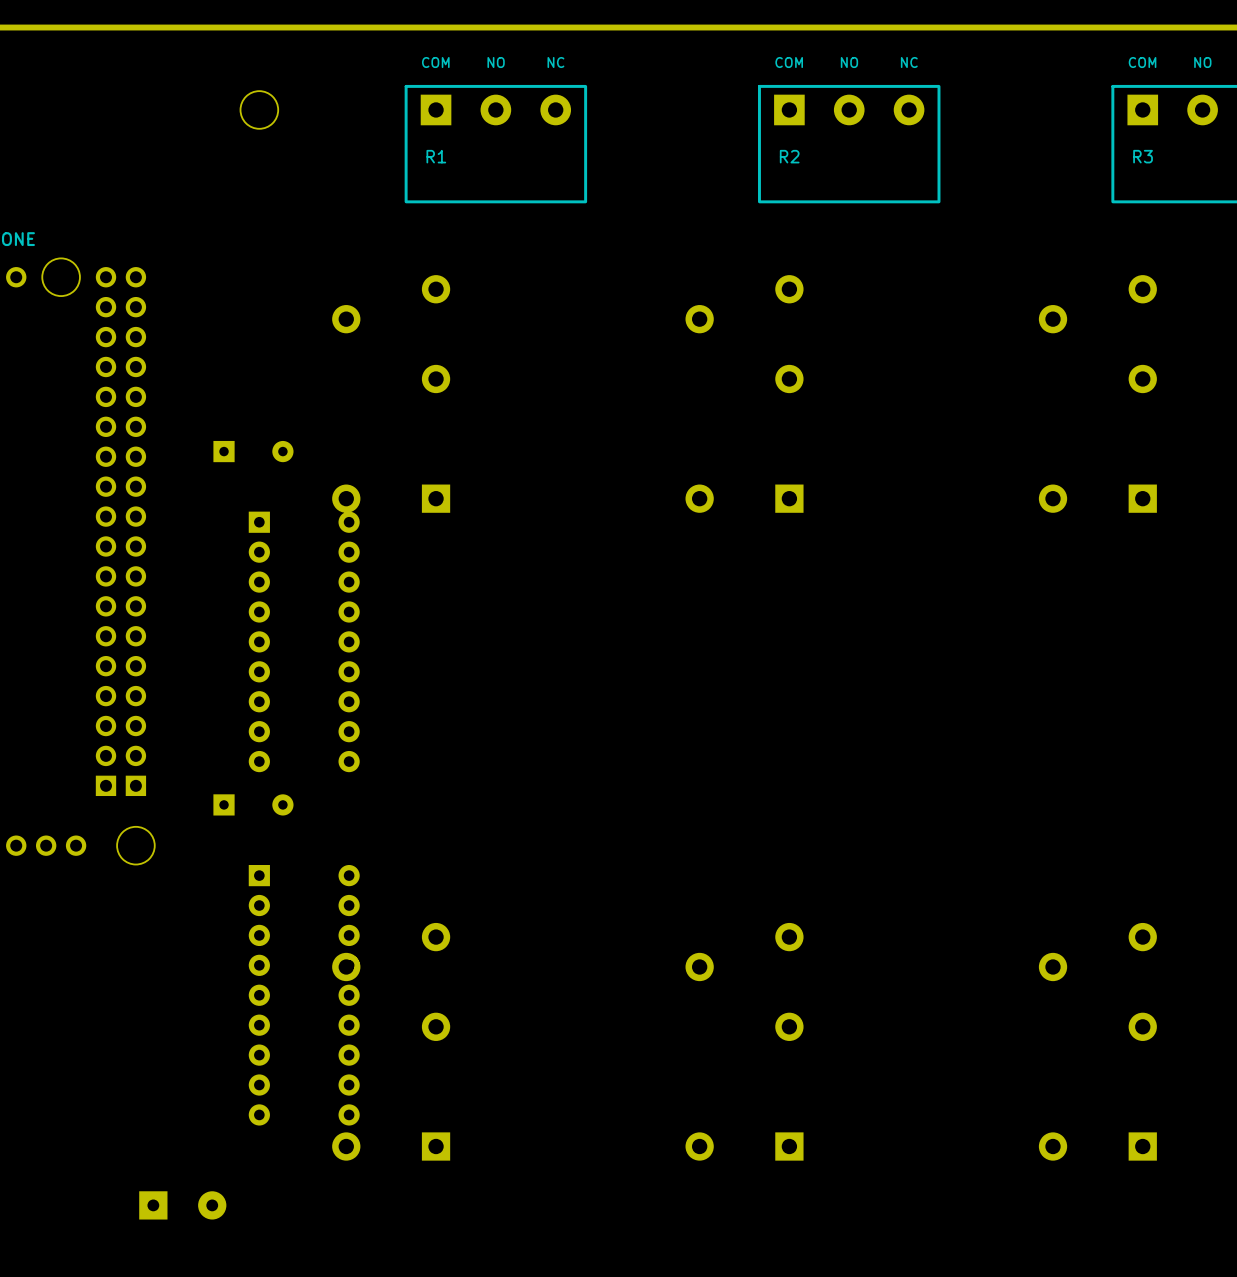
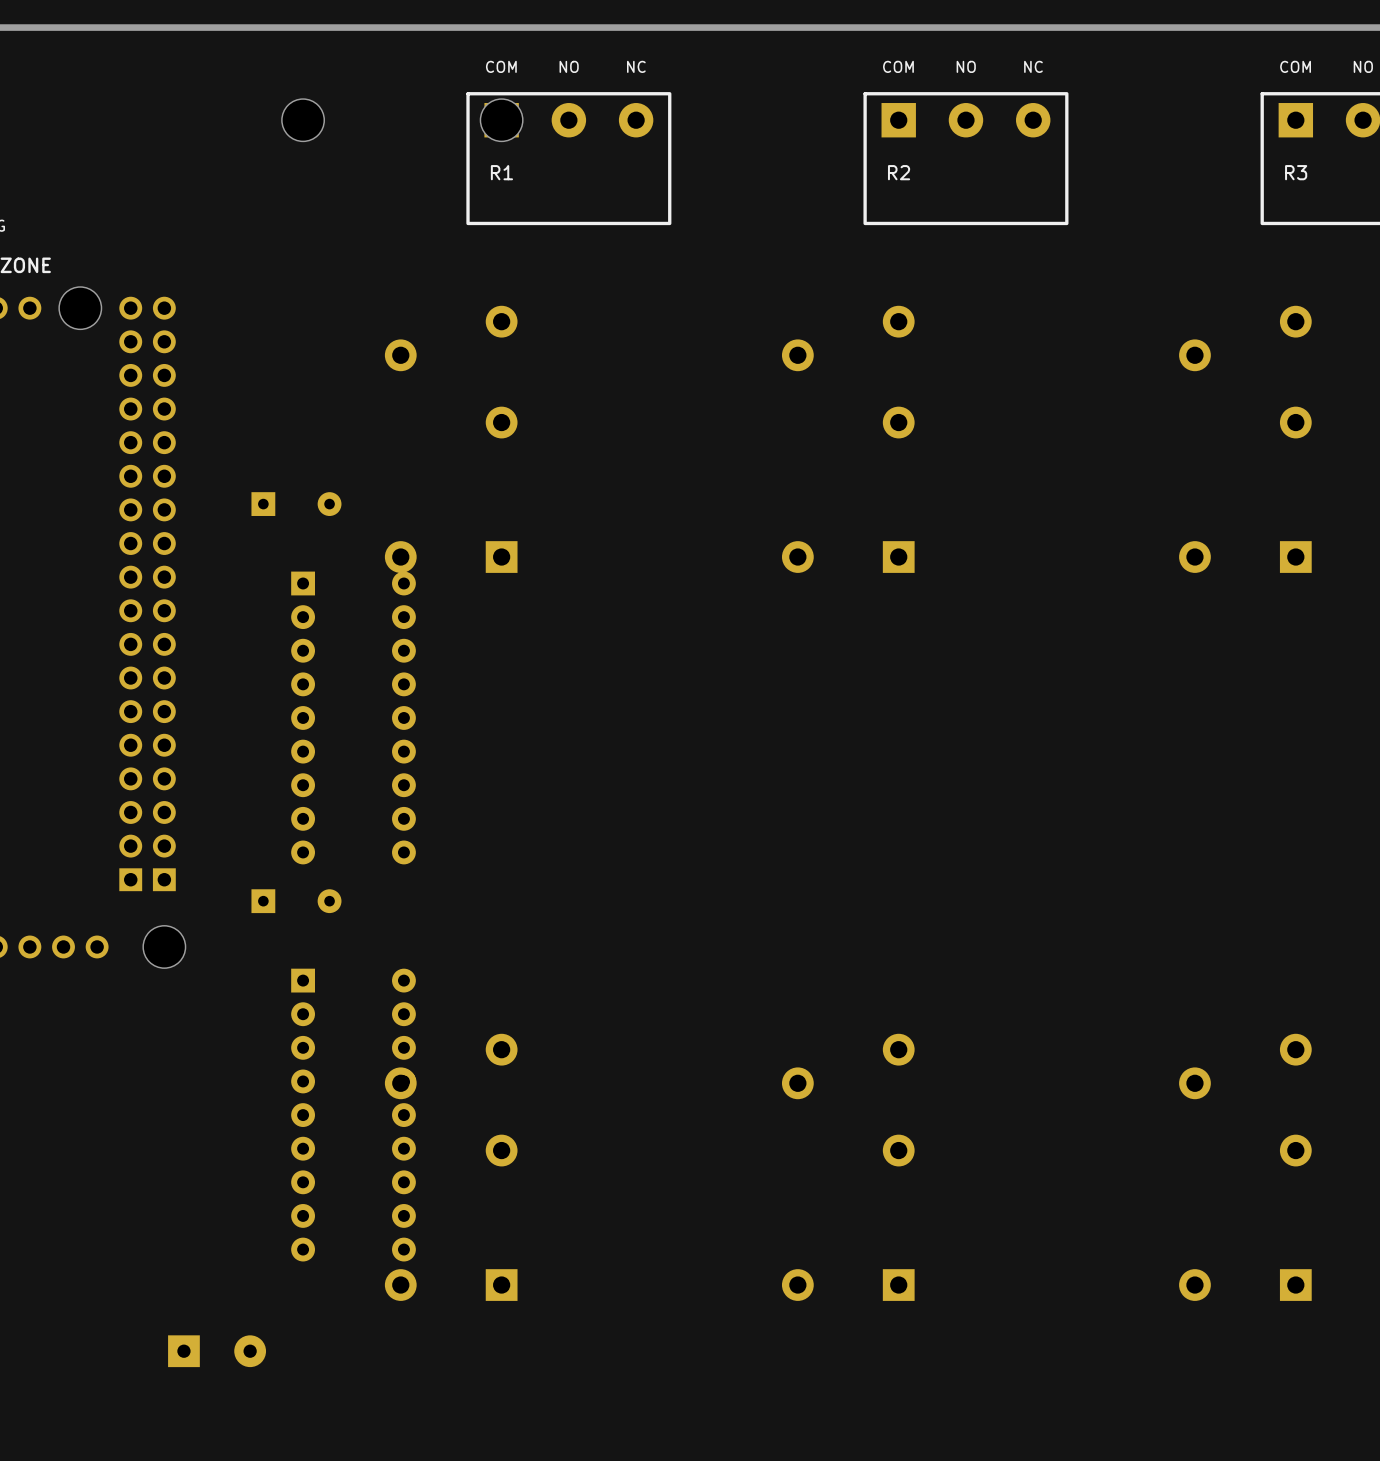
part: none -> (501, 120)

